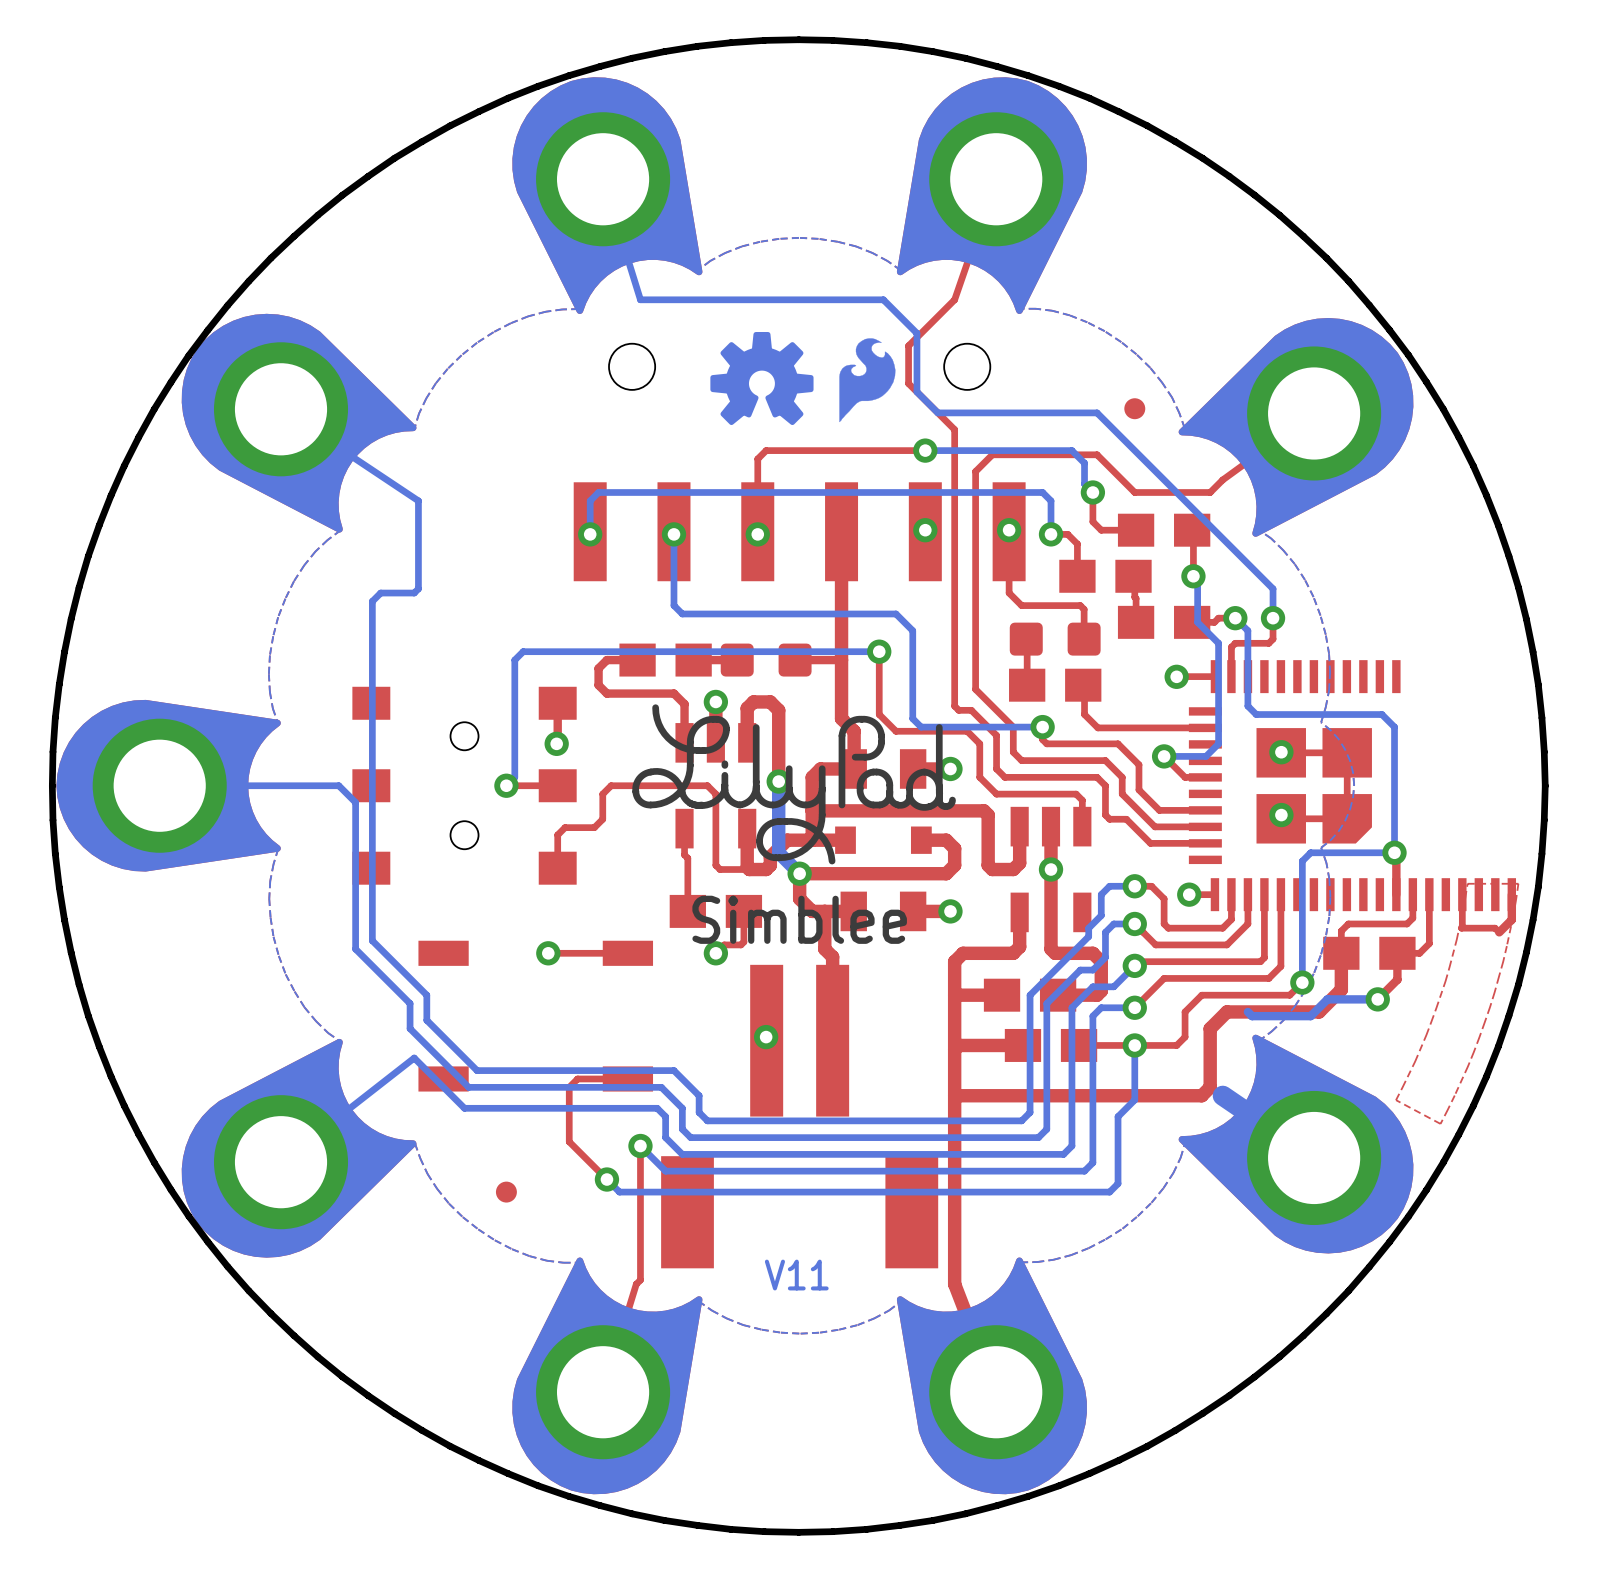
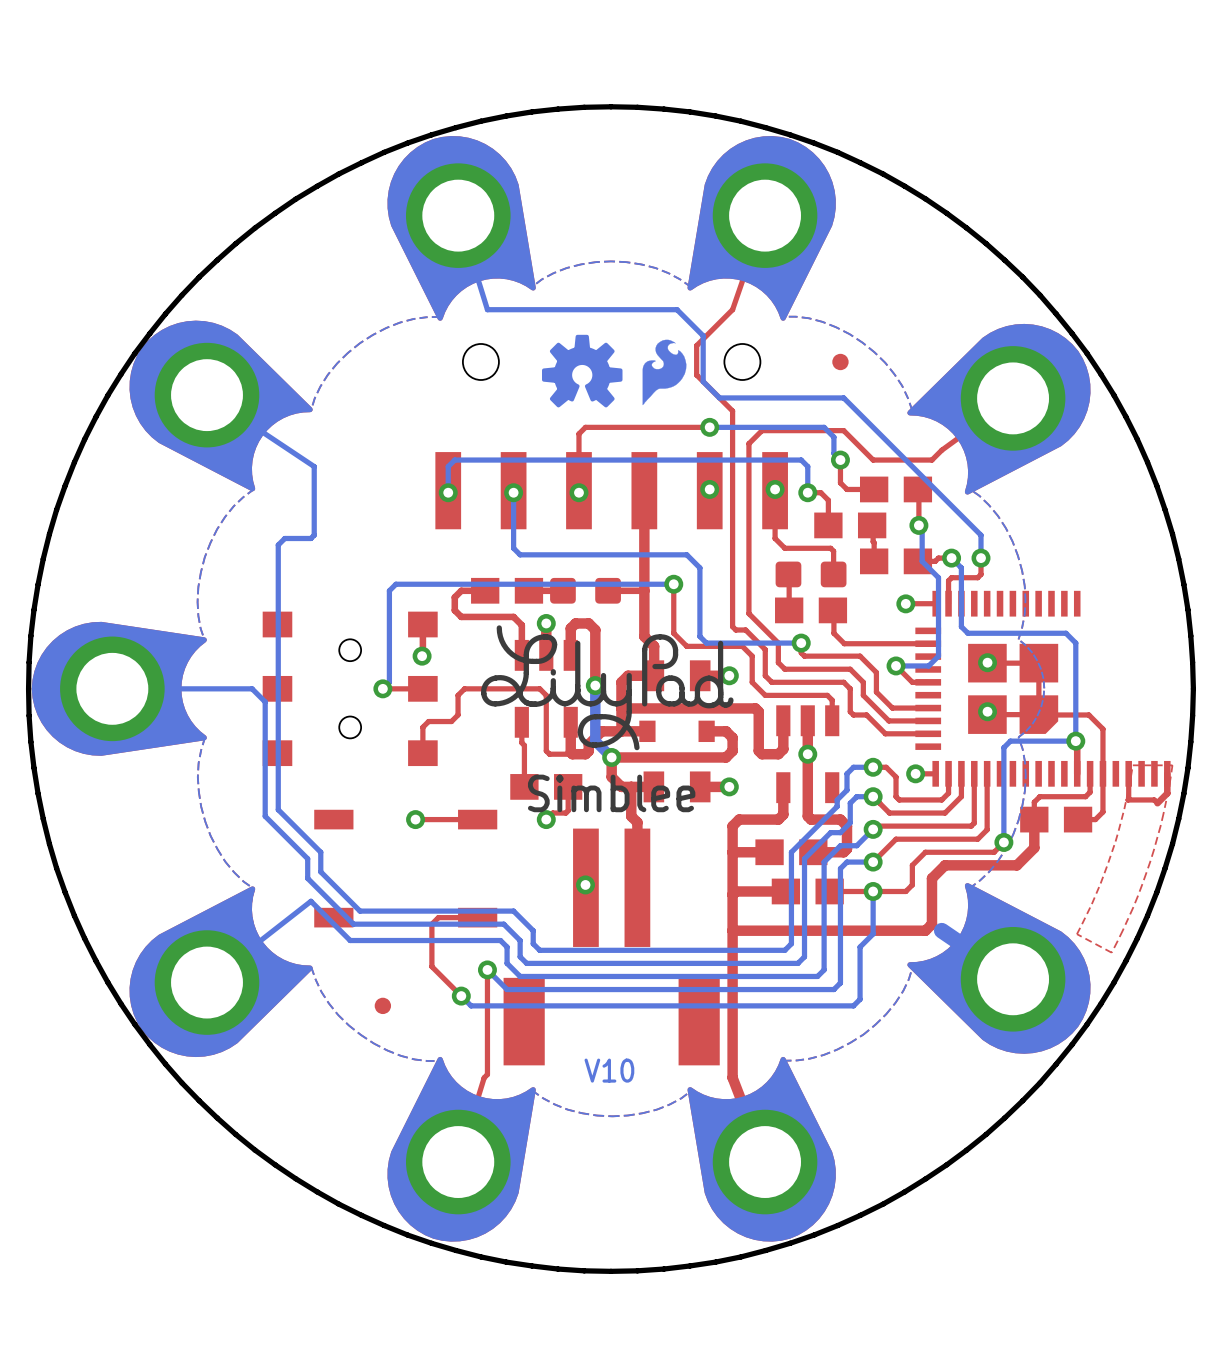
part position: (1134, 408) -> (840, 361)
top track: none -> (1039, 714) (1088, 714) (1102, 729) (1102, 773)
top track: (1397, 953) (1397, 979) (1377, 999) -> none
bottom track: (1377, 999) (1327, 999) (1310, 1016) (1252, 1016) (1247, 1011) -> none
via: (1377, 999) -> none
text: V11 (796, 1275) -> V10 (609, 1070)

